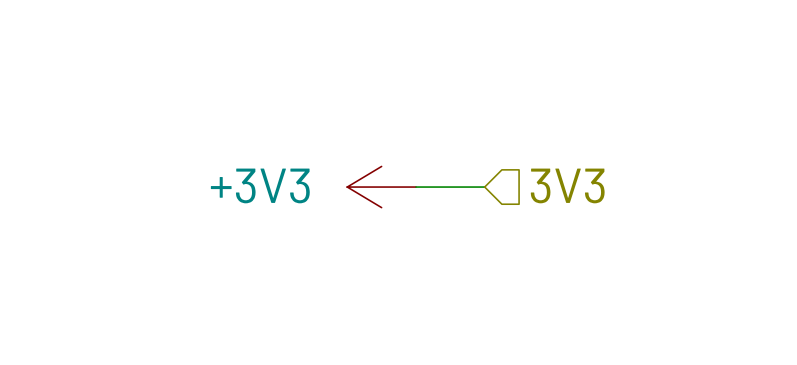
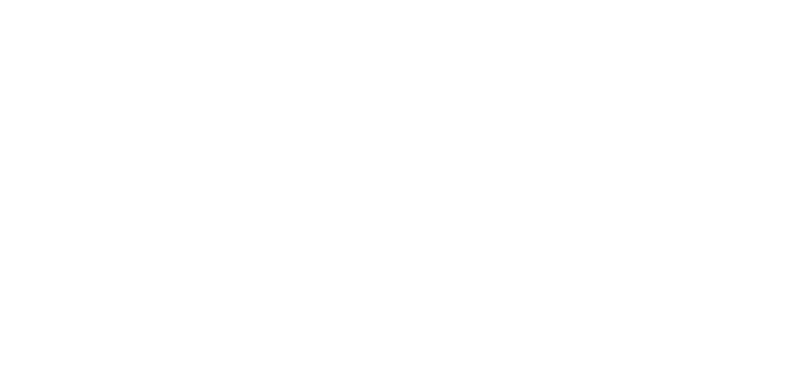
hierarchical label: 3V3 (567, 185) -> none
power symbol: +3V3 (381, 187) -> none
wire: (416, 187) (484, 187) -> none

